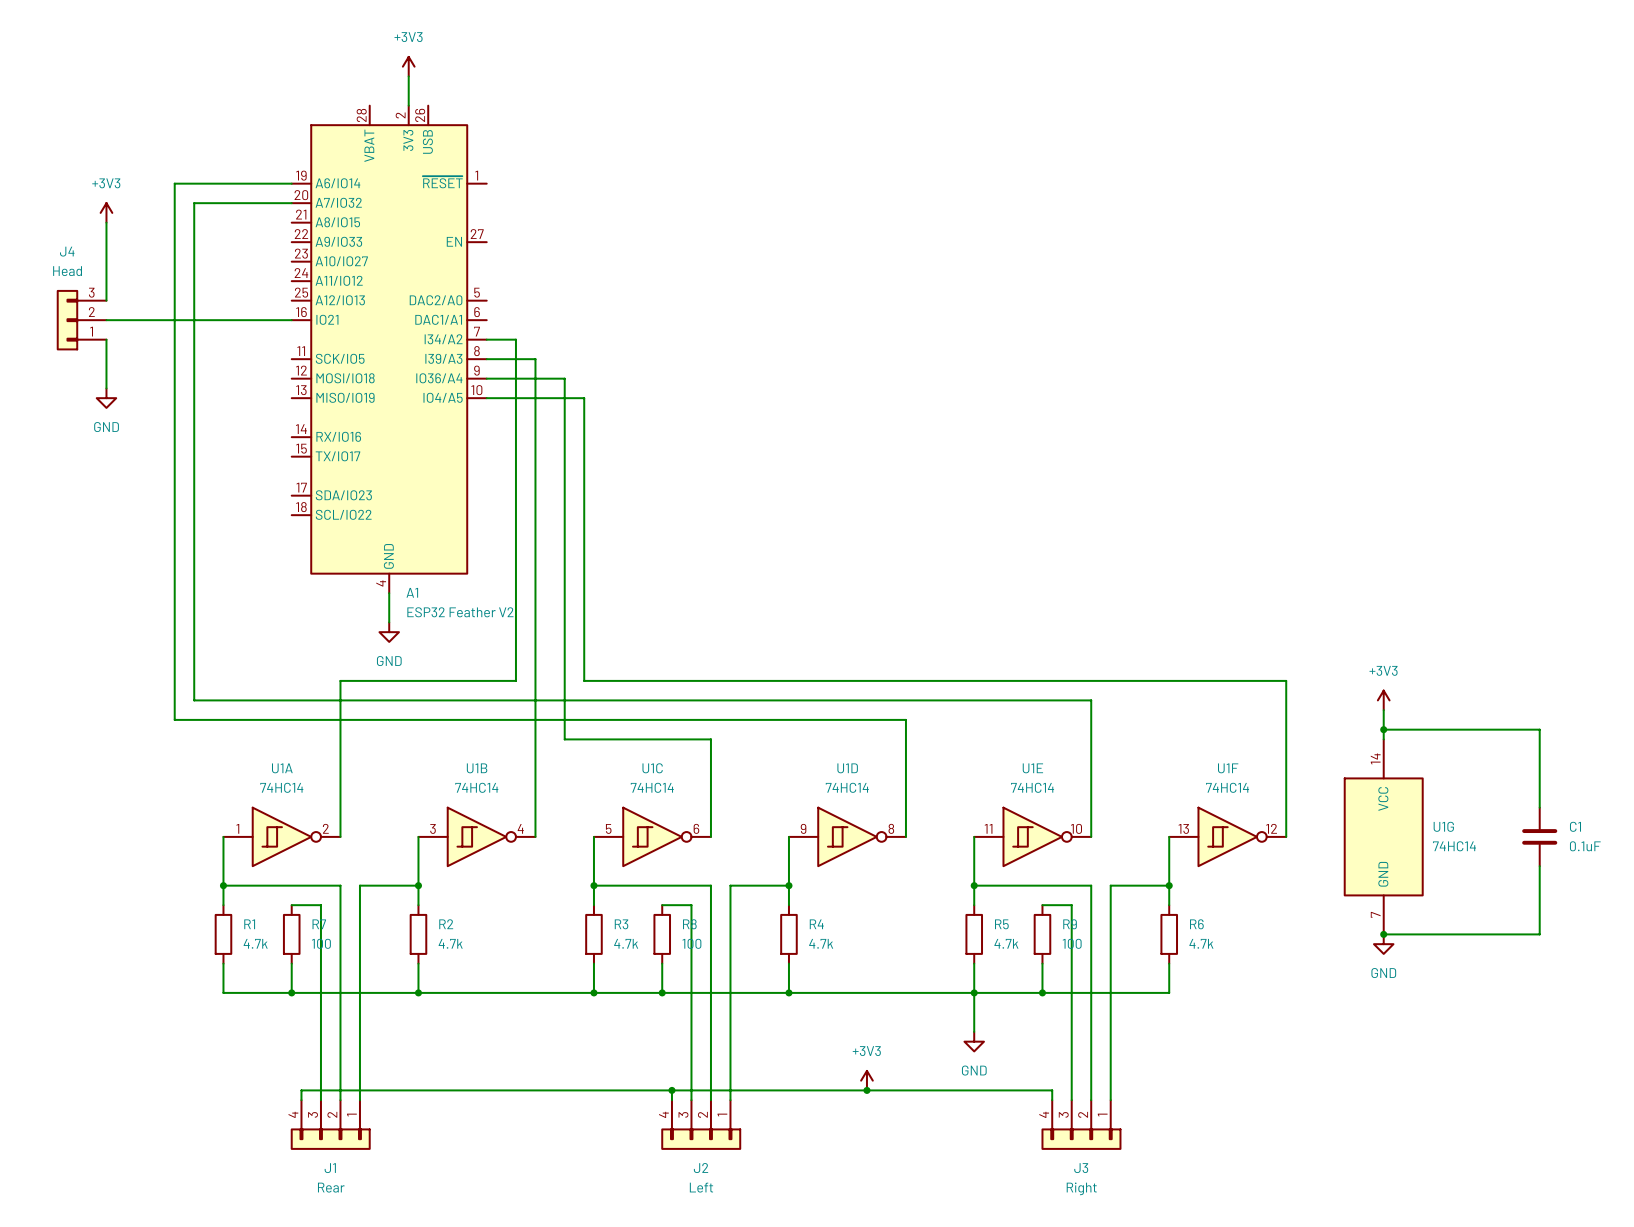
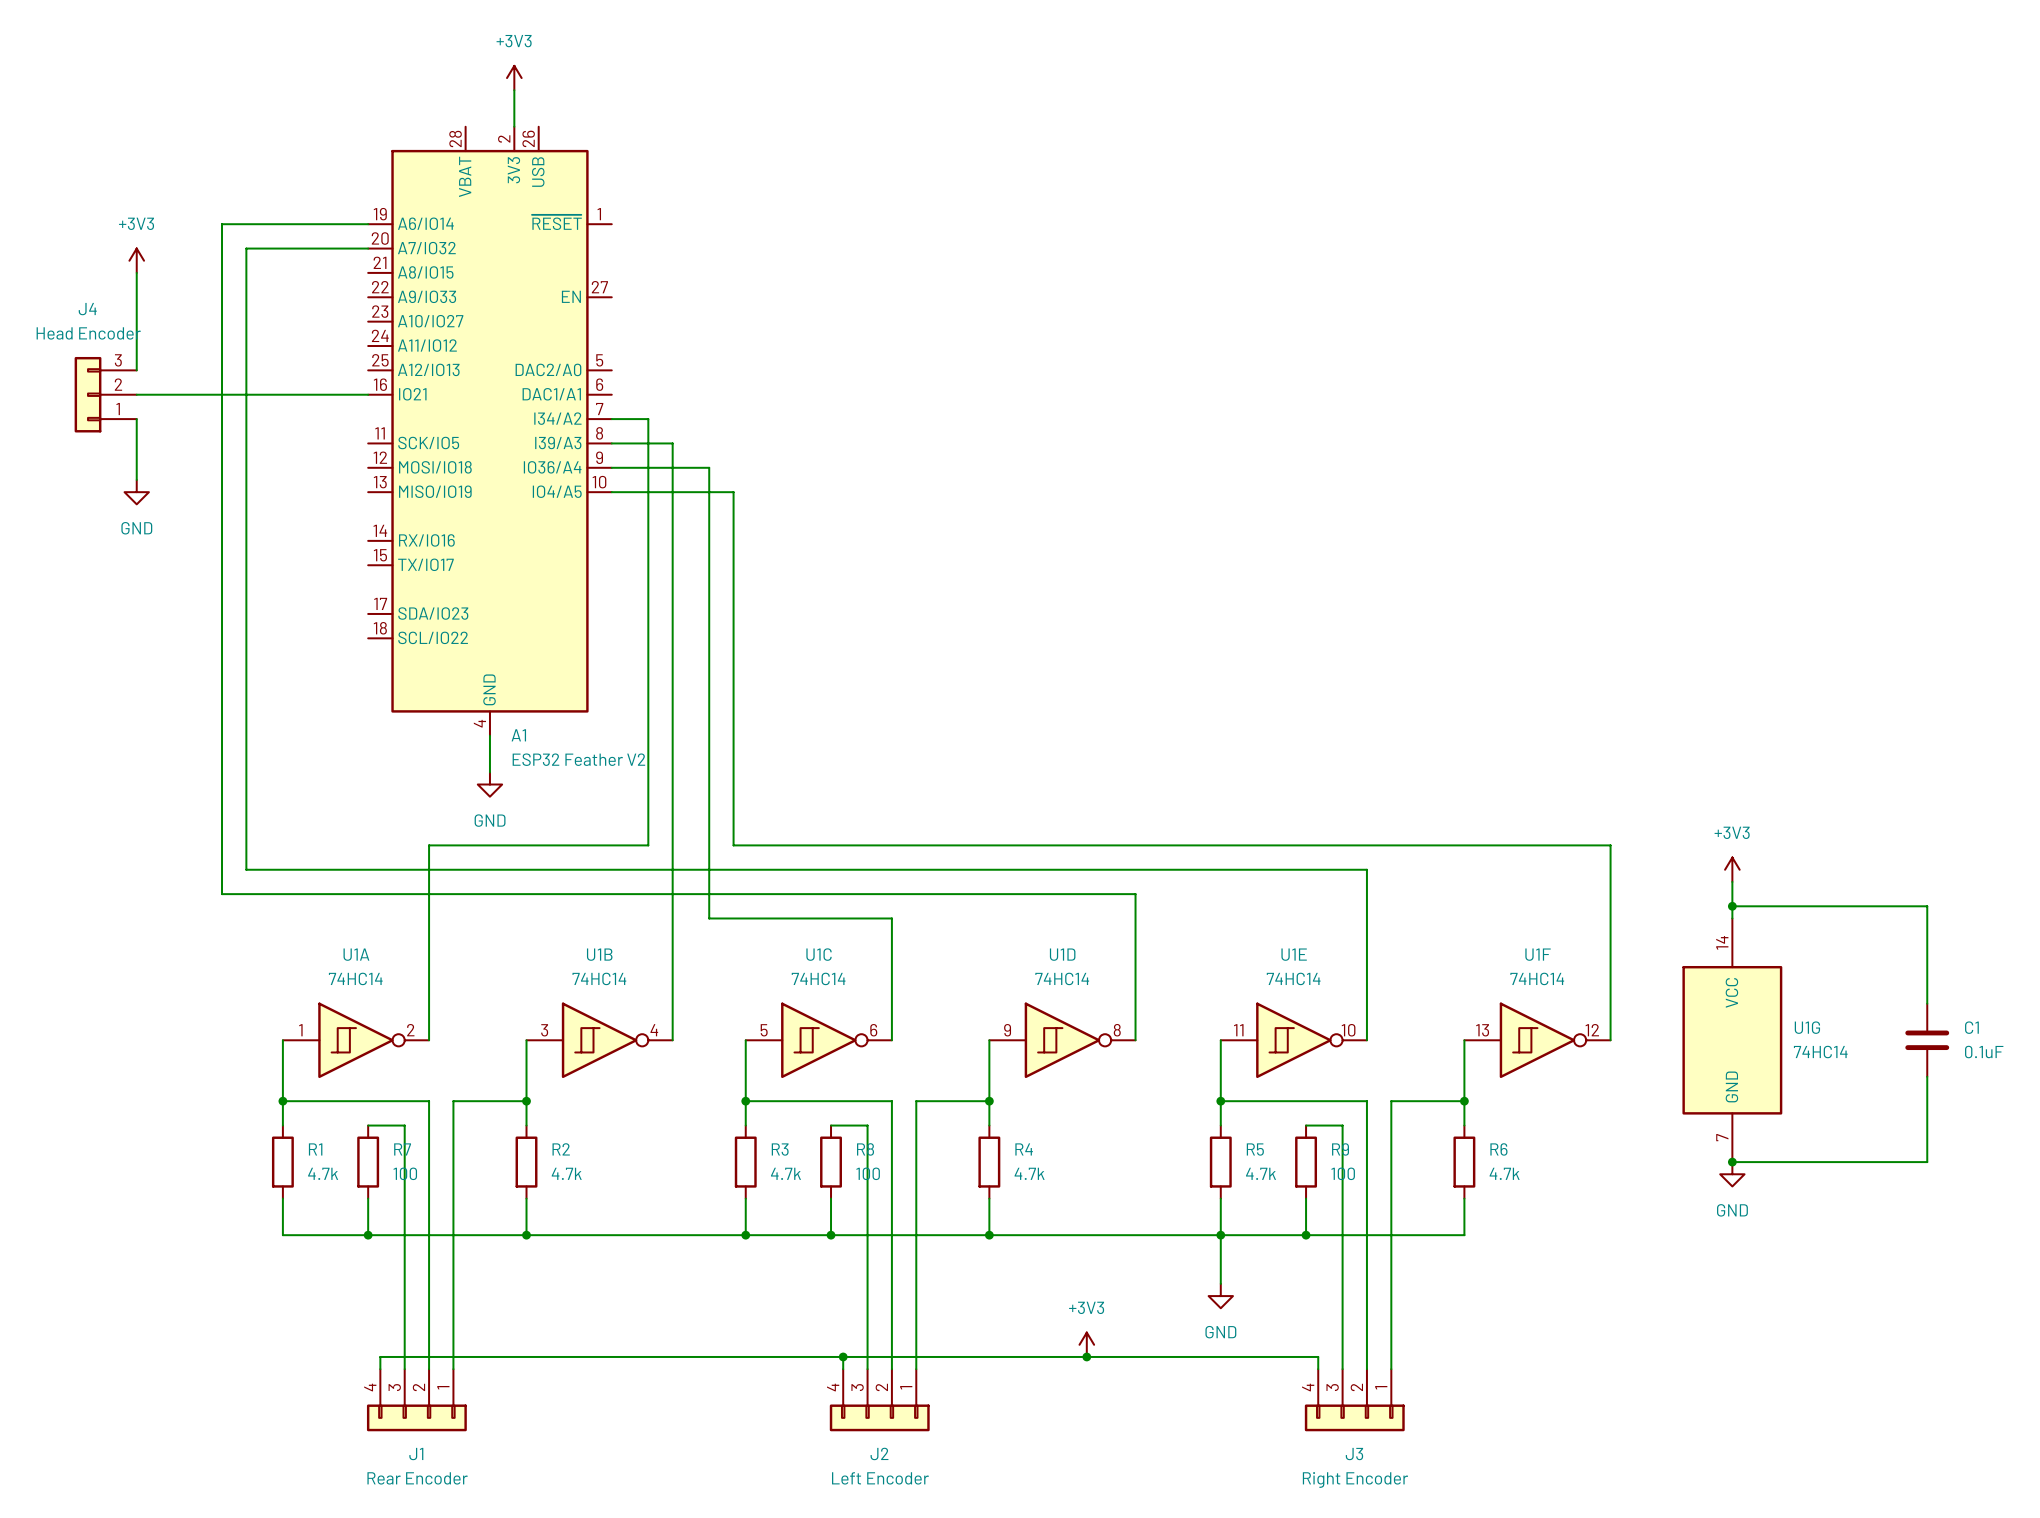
J4 value: Head (67, 271) -> Head Encoder (88, 333)
J1 value: Rear (331, 1187) -> Rear Encoder (417, 1478)
J2 value: Left (701, 1187) -> Left Encoder (880, 1478)
J3 value: Right (1081, 1188) -> Right Encoder (1355, 1479)

